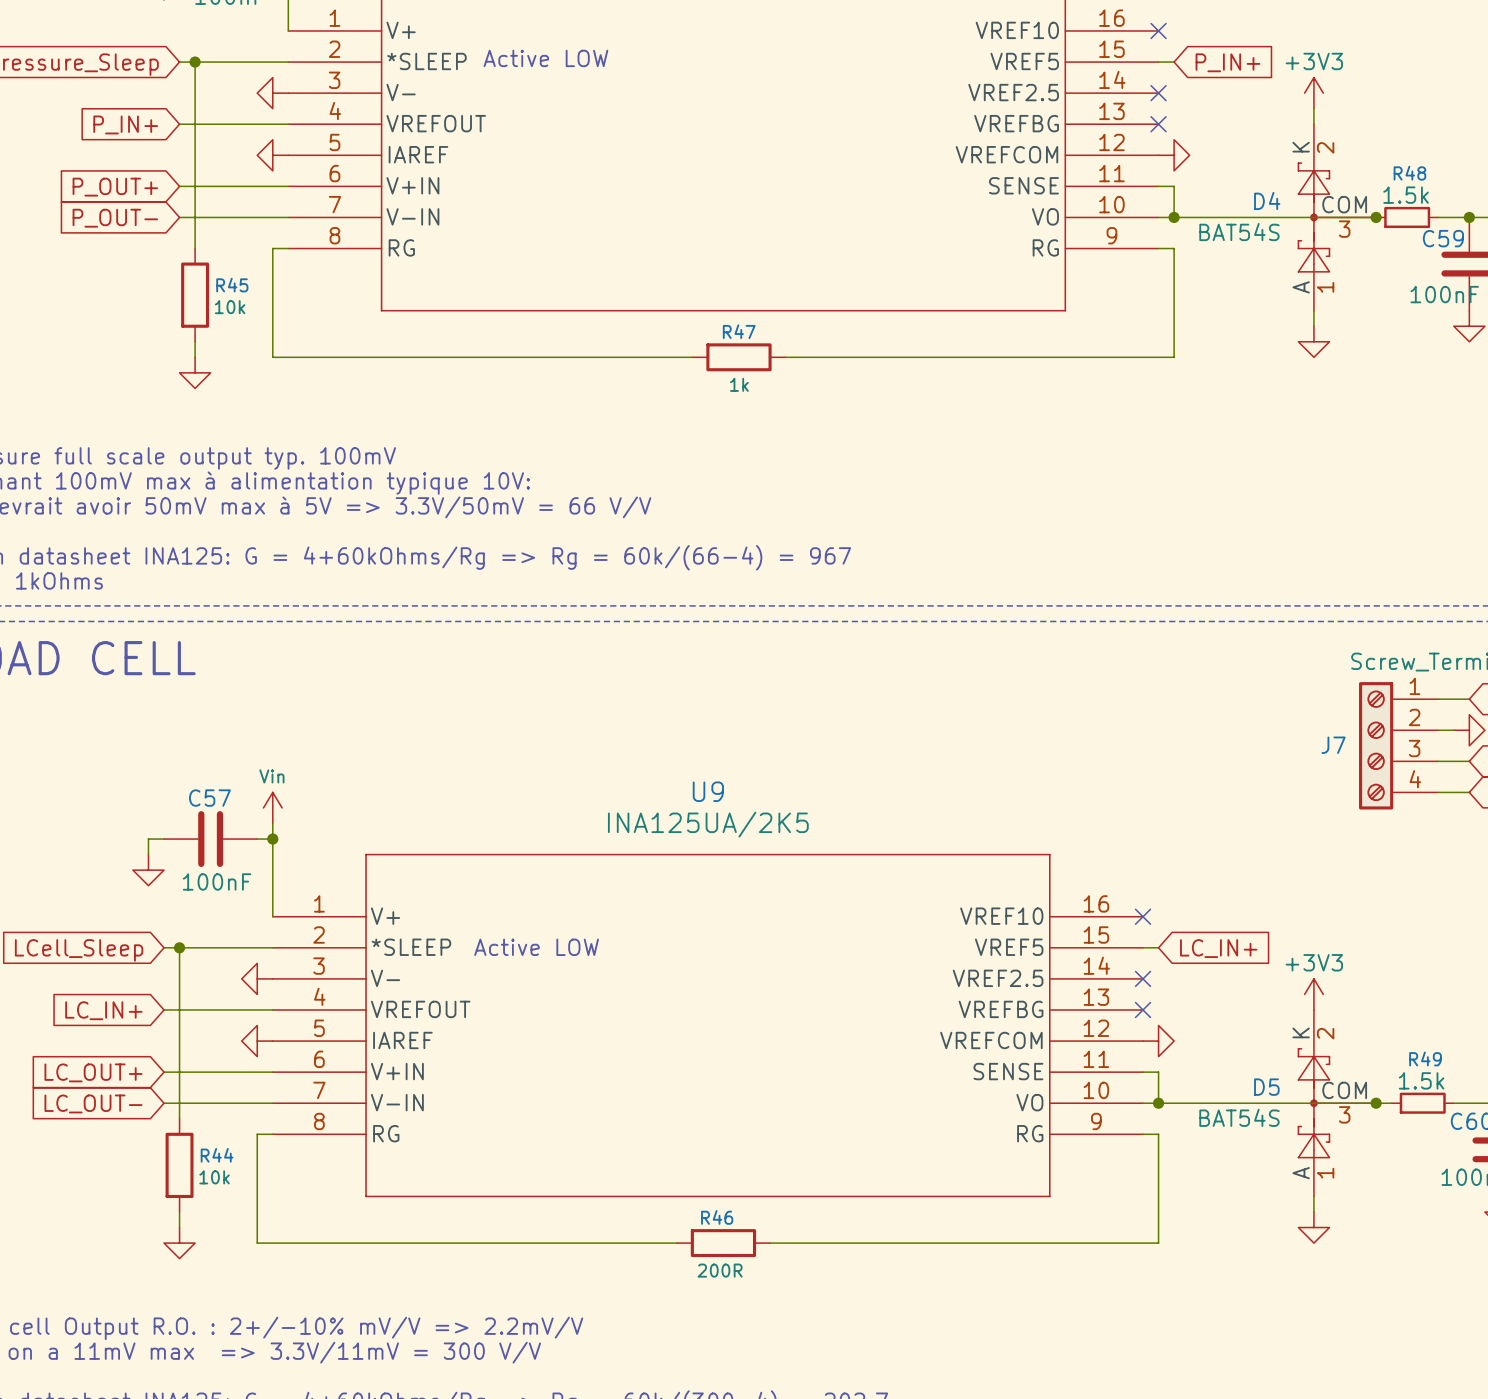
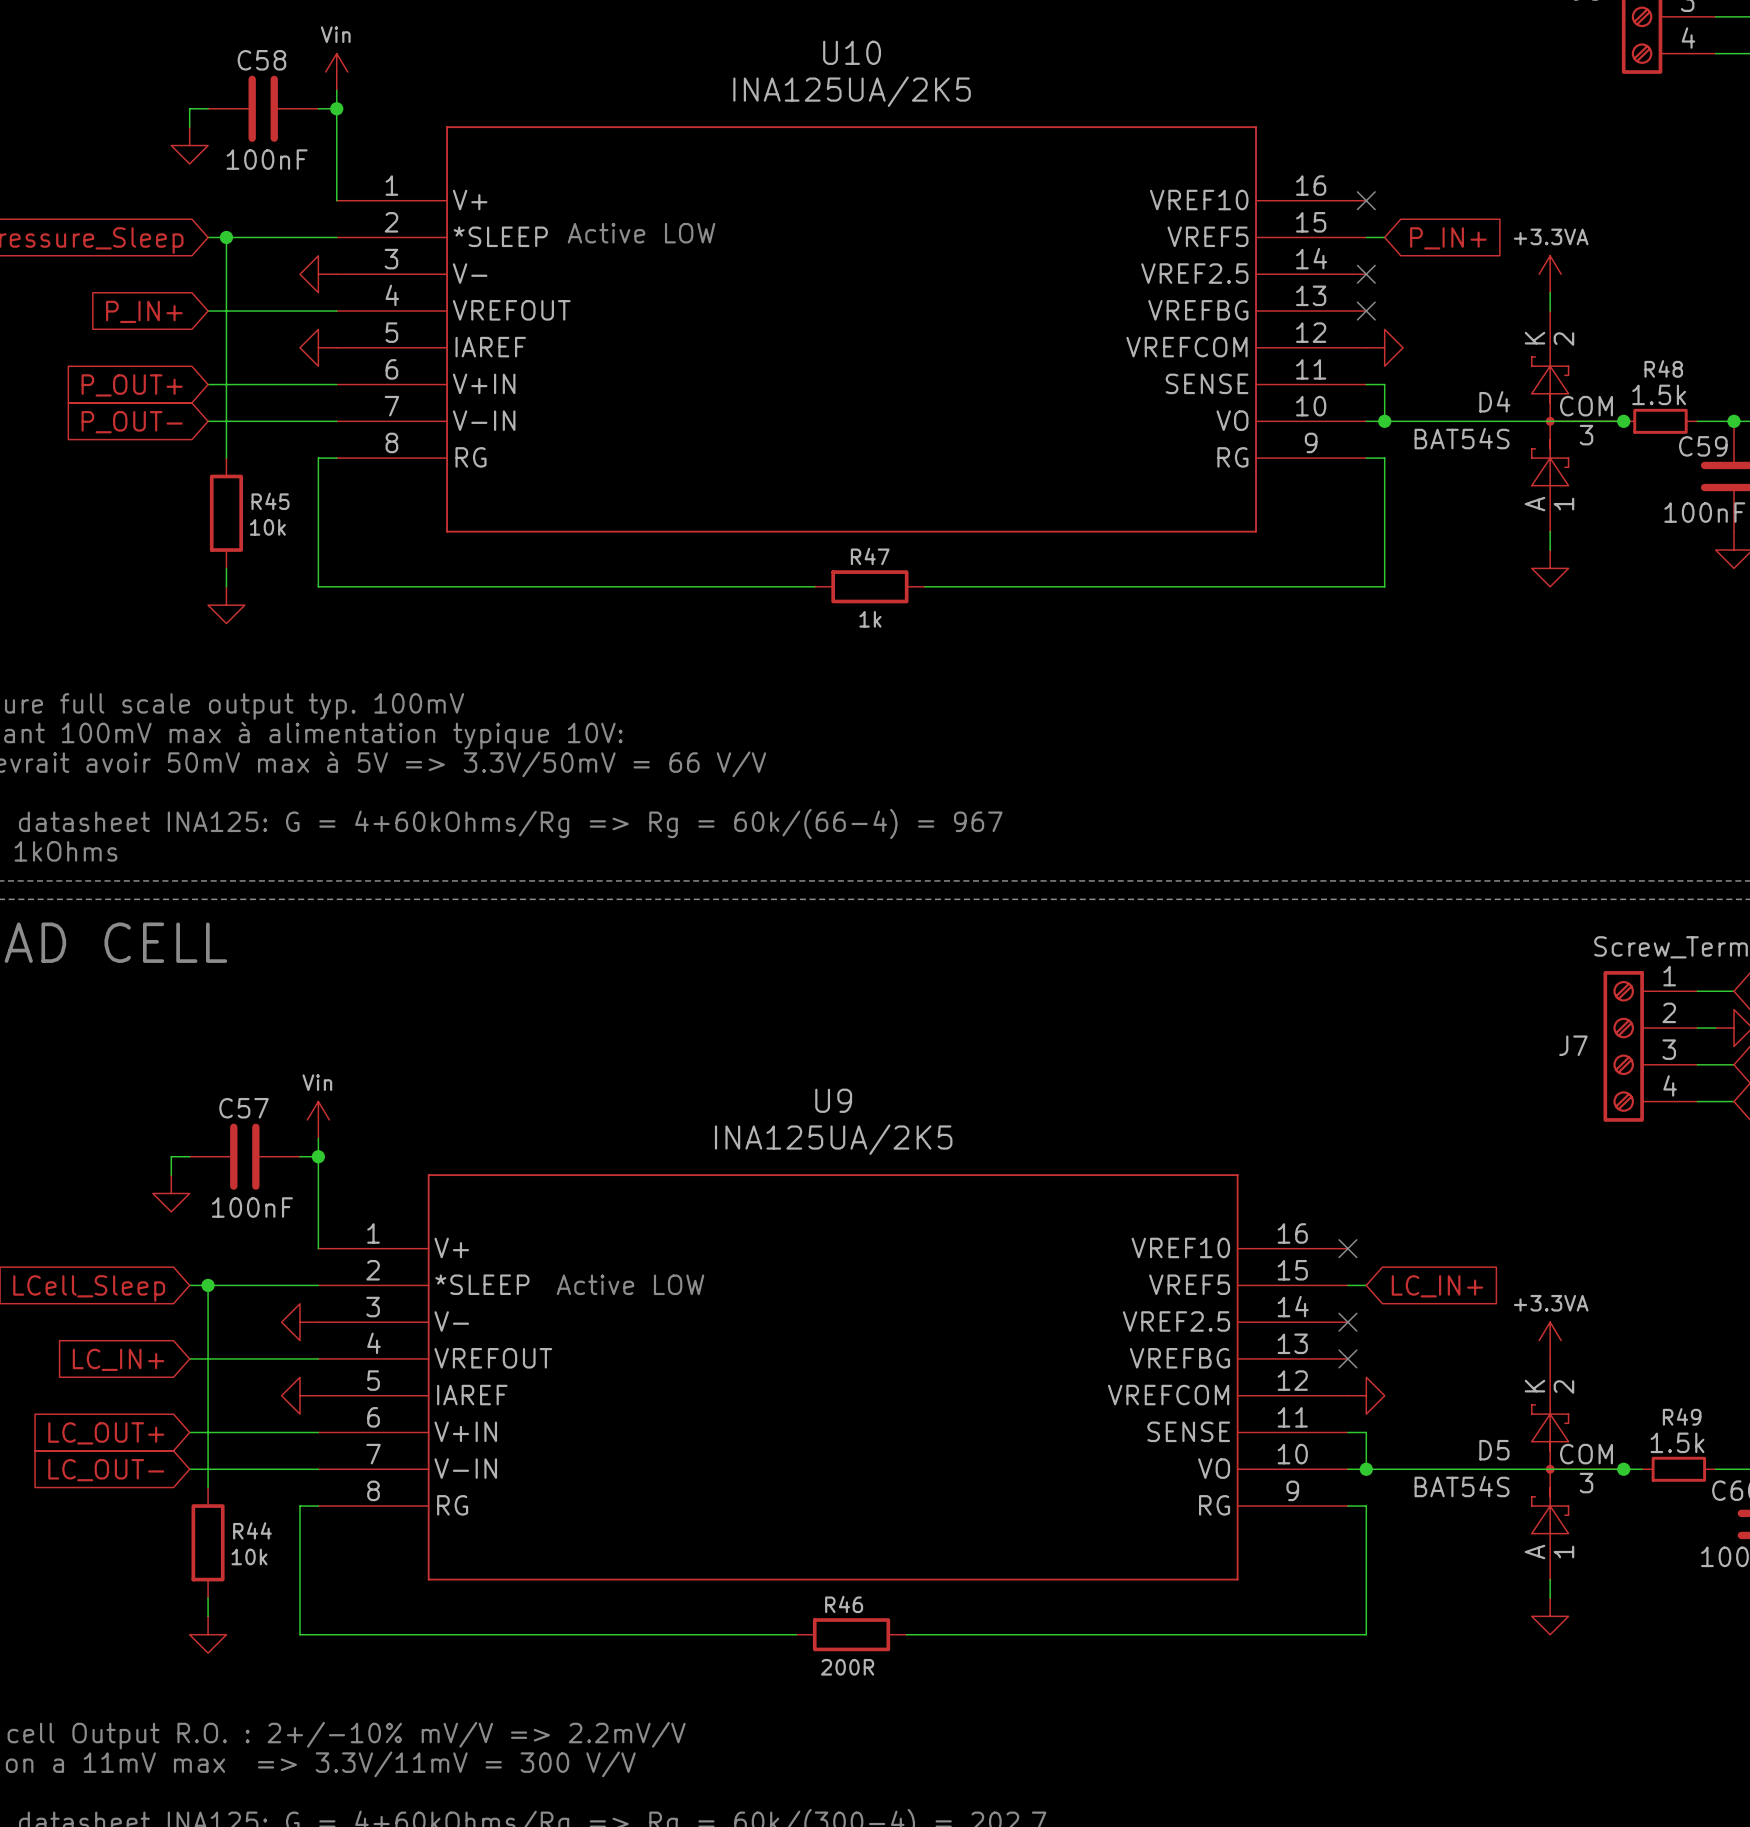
power symbol: +3V3 (1313, 93) -> +3.3VA (1550, 274)
power symbol: +3V3 (1313, 994) -> +3.3VA (1550, 1340)

